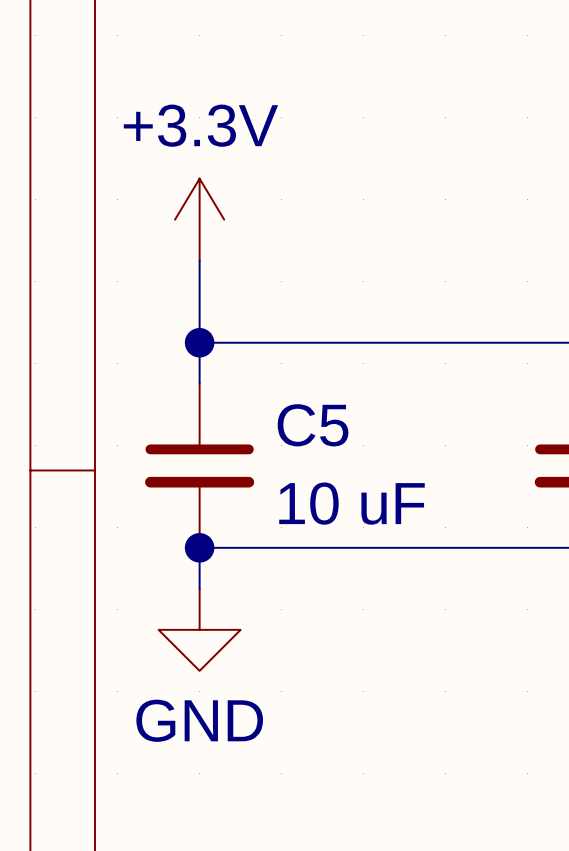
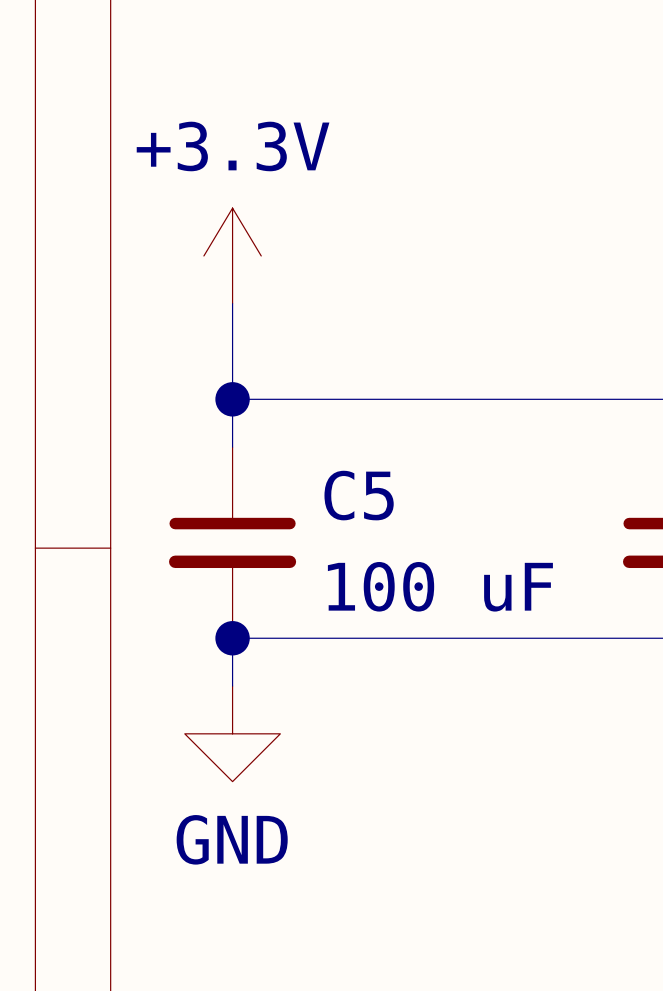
C5 value: 10 uF (351, 503) -> 100 uF (440, 586)

